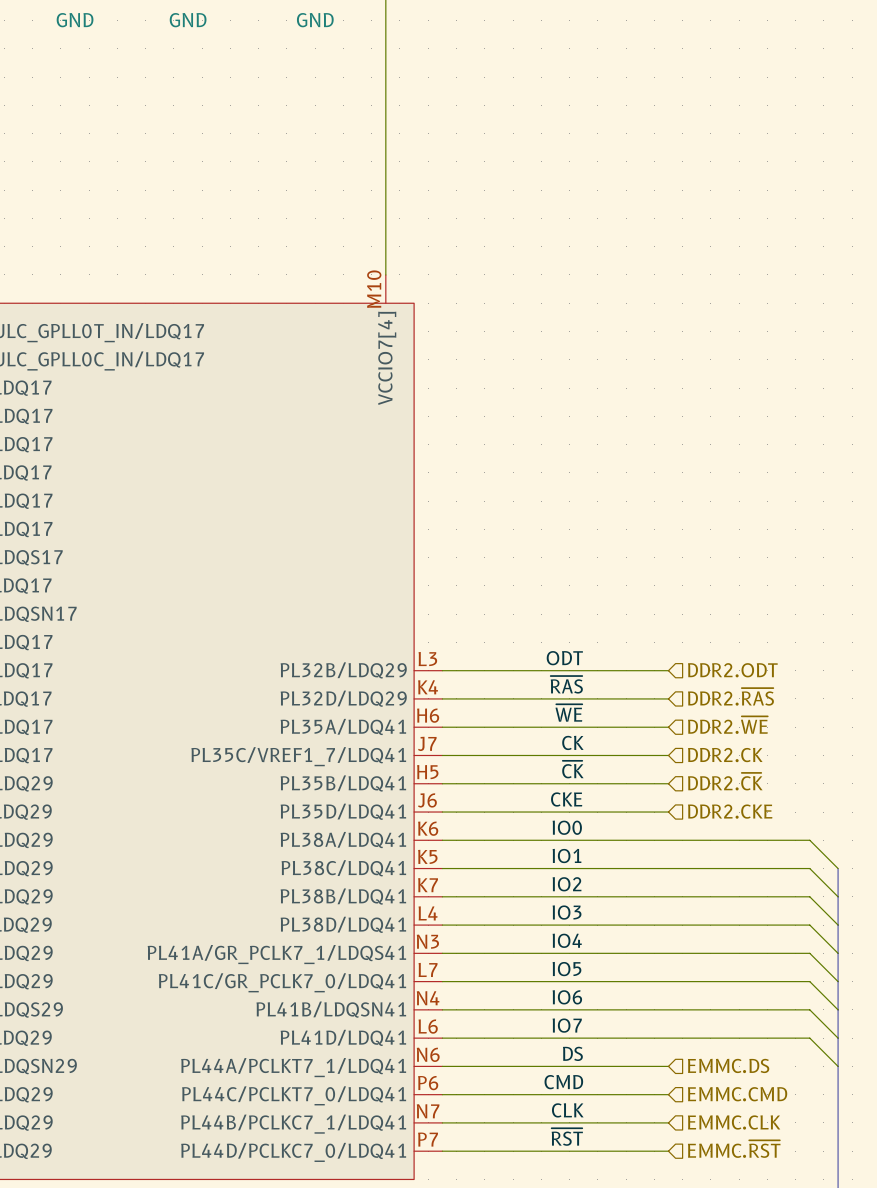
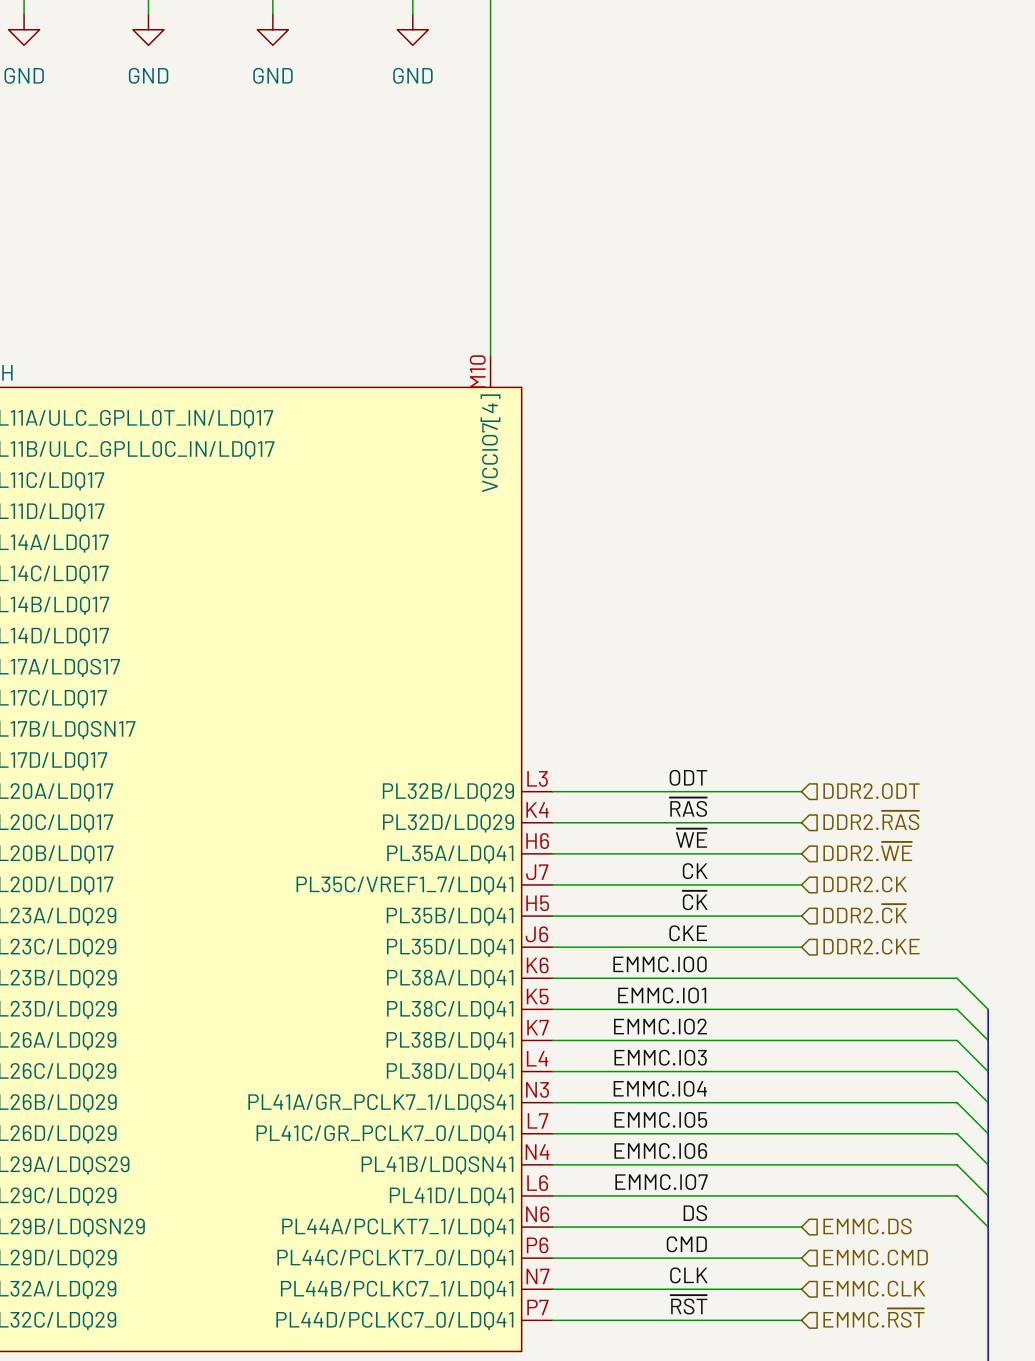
label: IO0 (567, 827) -> EMMC.IO0 (660, 964)
label: IO1 (566, 856) -> EMMC.IO1 (662, 995)
label: IO2 (567, 884) -> EMMC.IO2 (660, 1026)
label: IO3 (567, 912) -> EMMC.IO3 (660, 1057)
label: IO4 (567, 940) -> EMMC.IO4 (660, 1088)
label: IO5 (566, 969) -> EMMC.IO5 (660, 1119)
label: IO6 (567, 997) -> EMMC.IO6 (660, 1151)
label: IO7 (567, 1025) -> EMMC.IO7 (661, 1182)

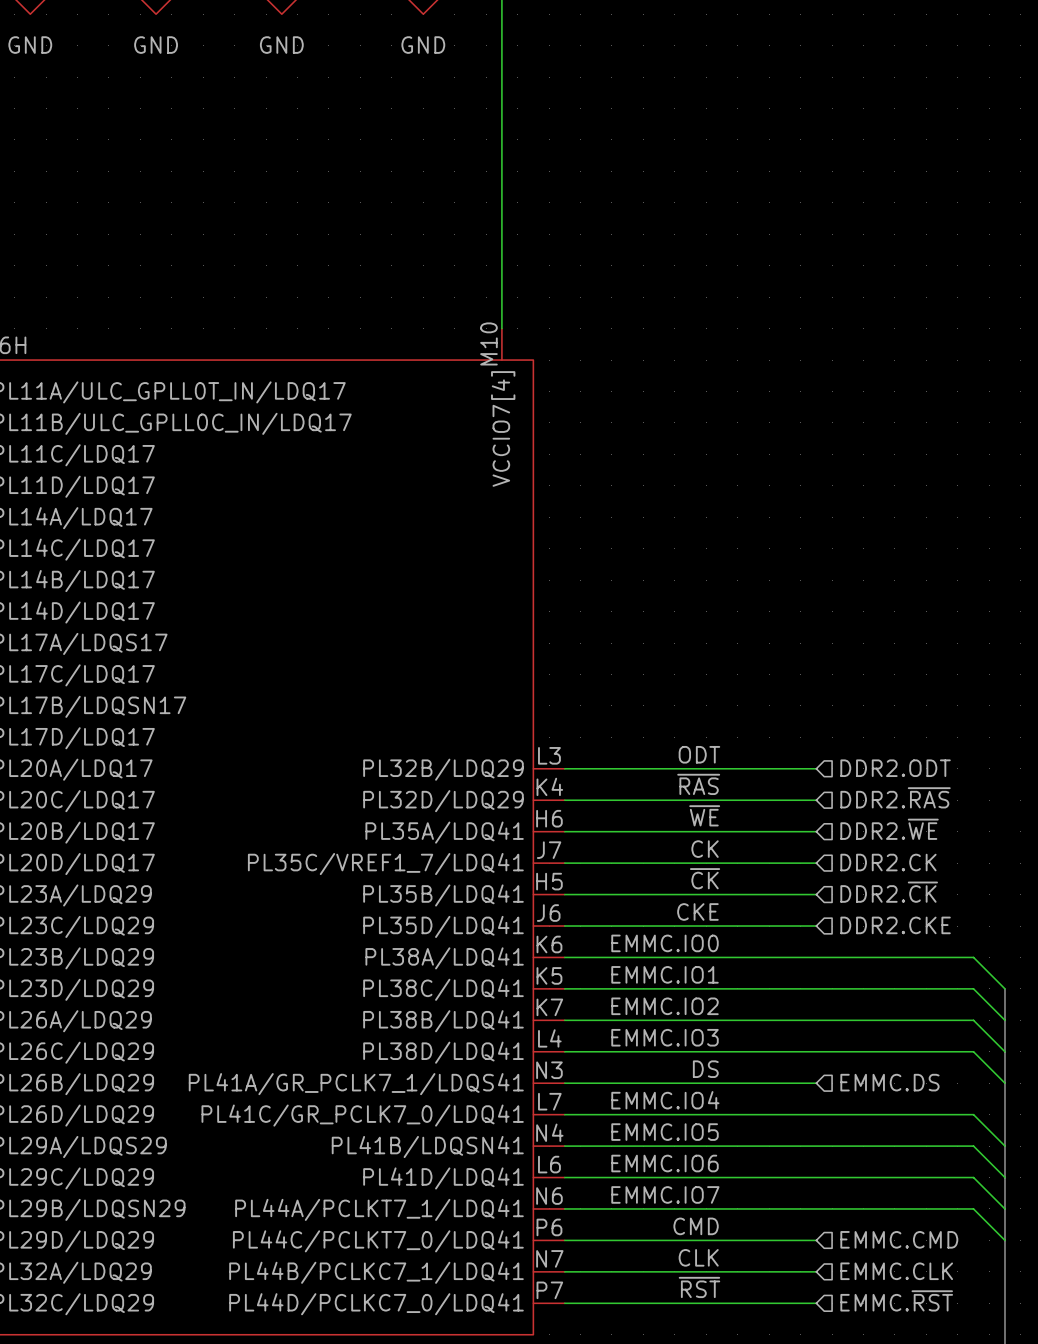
label: EMMC.IO4 (660, 1088) -> DS (705, 1069)
wire: (801, 1102) (957, 1102) (988, 1133) -> (816, 1208) (973, 1208) (1004, 1240)
label: EMMC.IO5 (660, 1119) -> EMMC.IO4 (665, 1100)
label: EMMC.IO6 (660, 1151) -> EMMC.IO5 (665, 1132)
label: EMMC.IO7 (661, 1182) -> EMMC.IO6 (665, 1163)
label: DS (695, 1213) -> EMMC.IO7 (665, 1194)
hierarchical label position: EMMC.DS (867, 1226) -> EMMC.DS (889, 1082)

